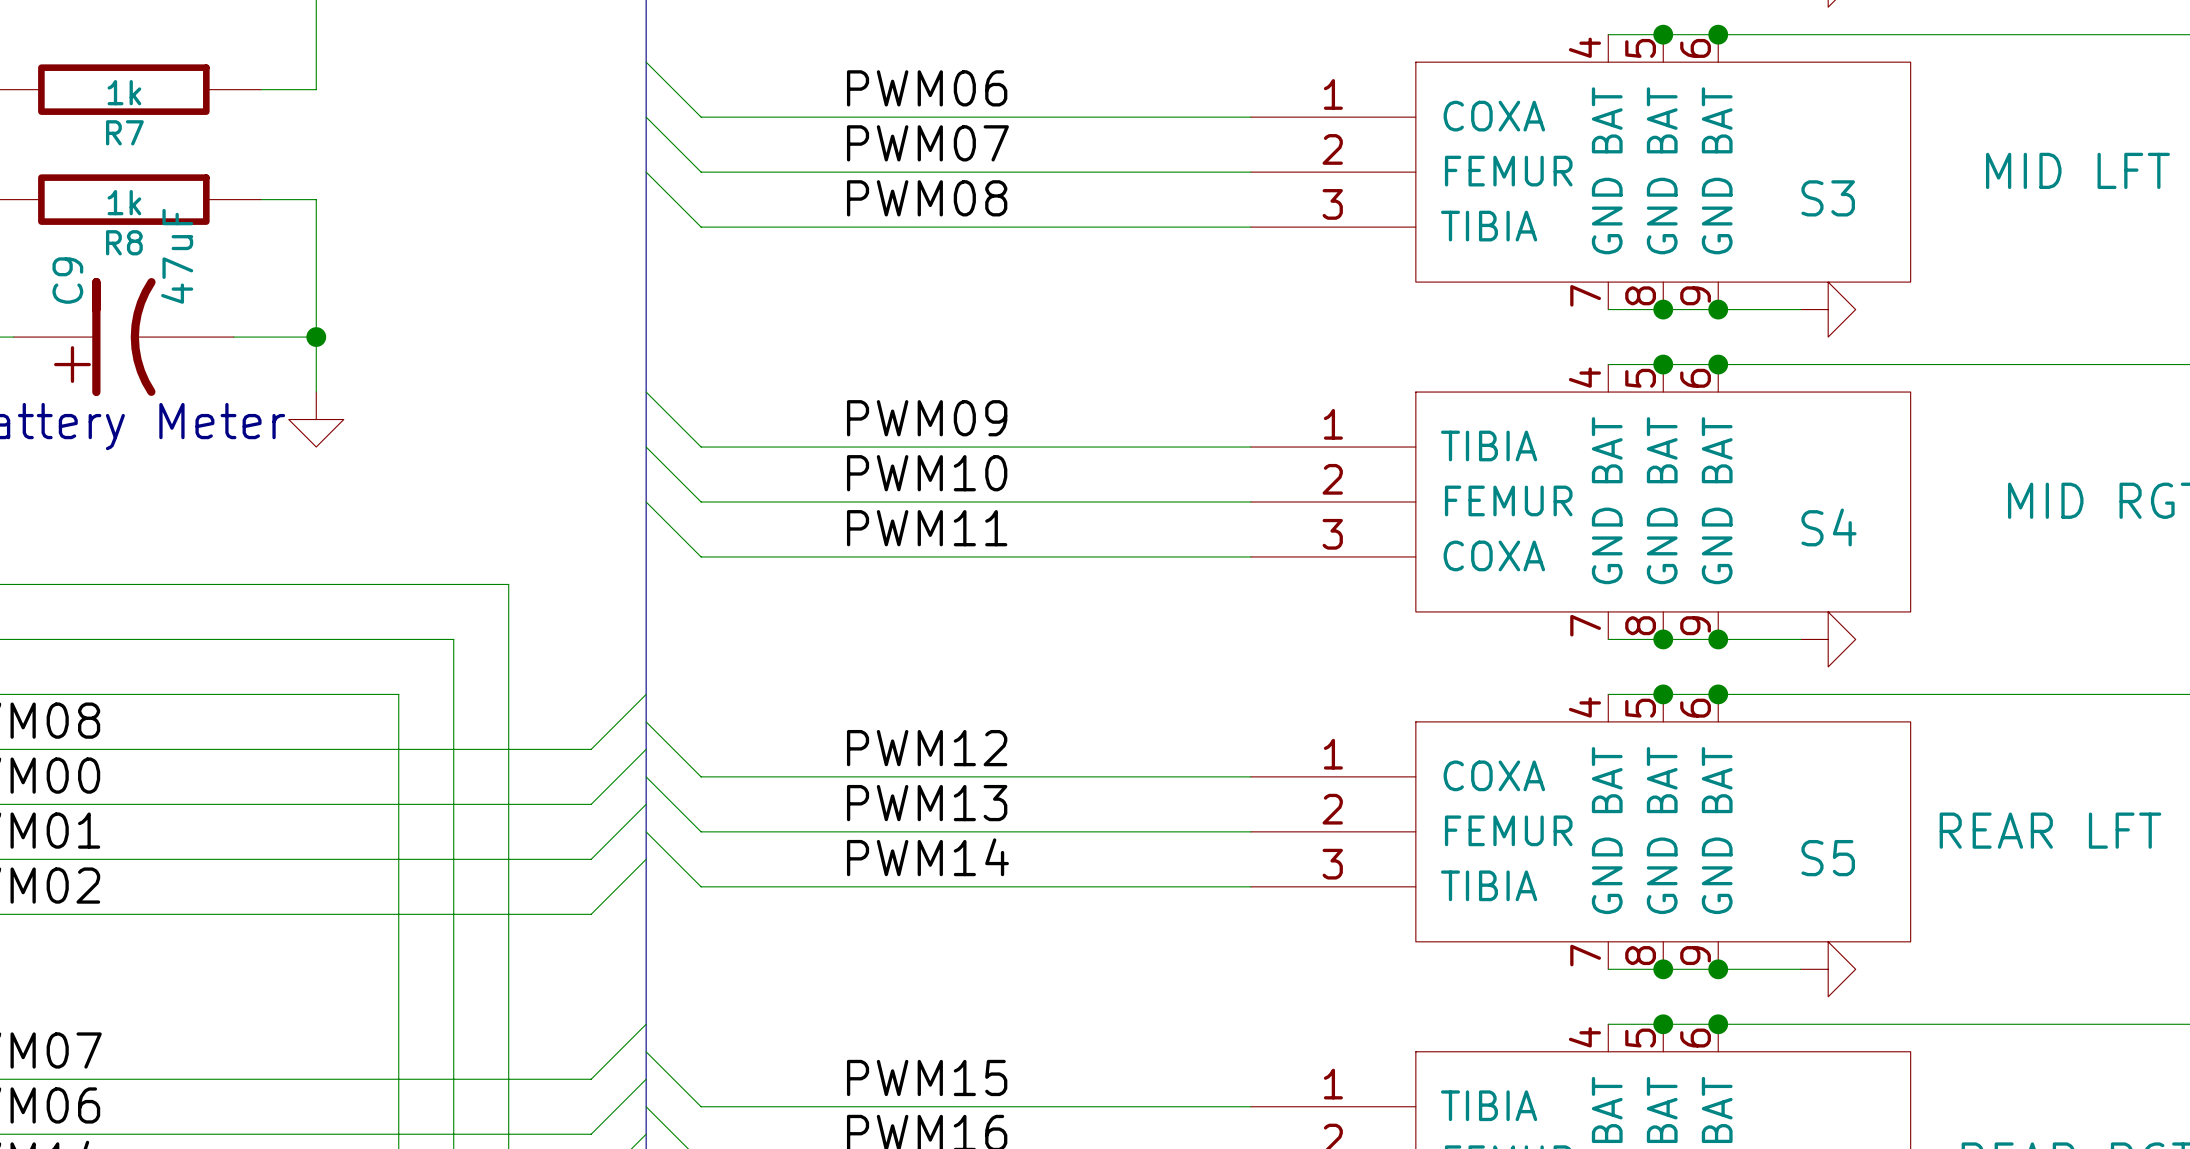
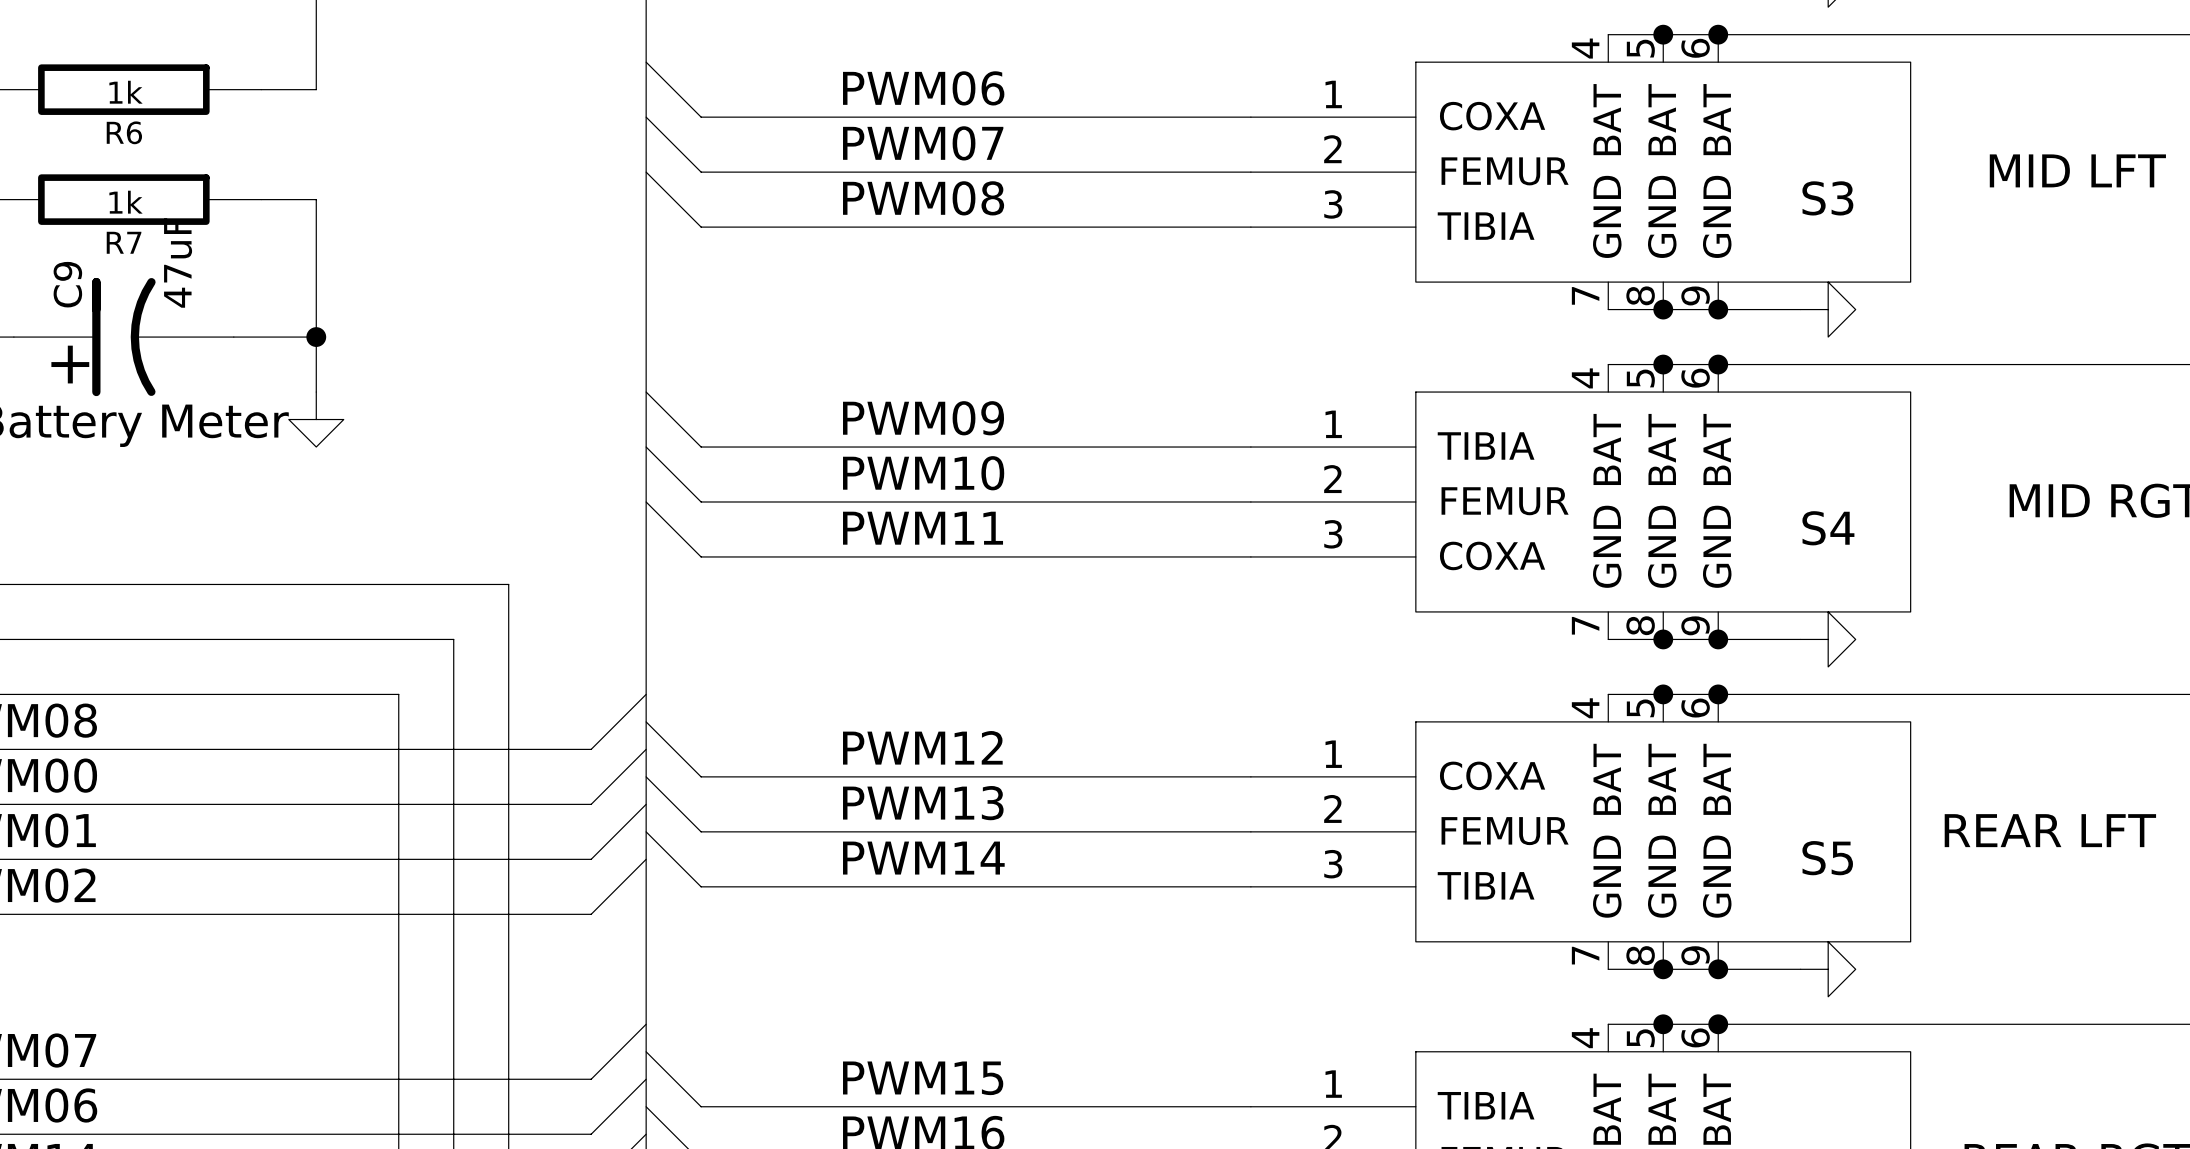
R7 name: R7 (124, 132) -> R6 (124, 132)
R8 name: R8 (124, 242) -> R7 (124, 242)

